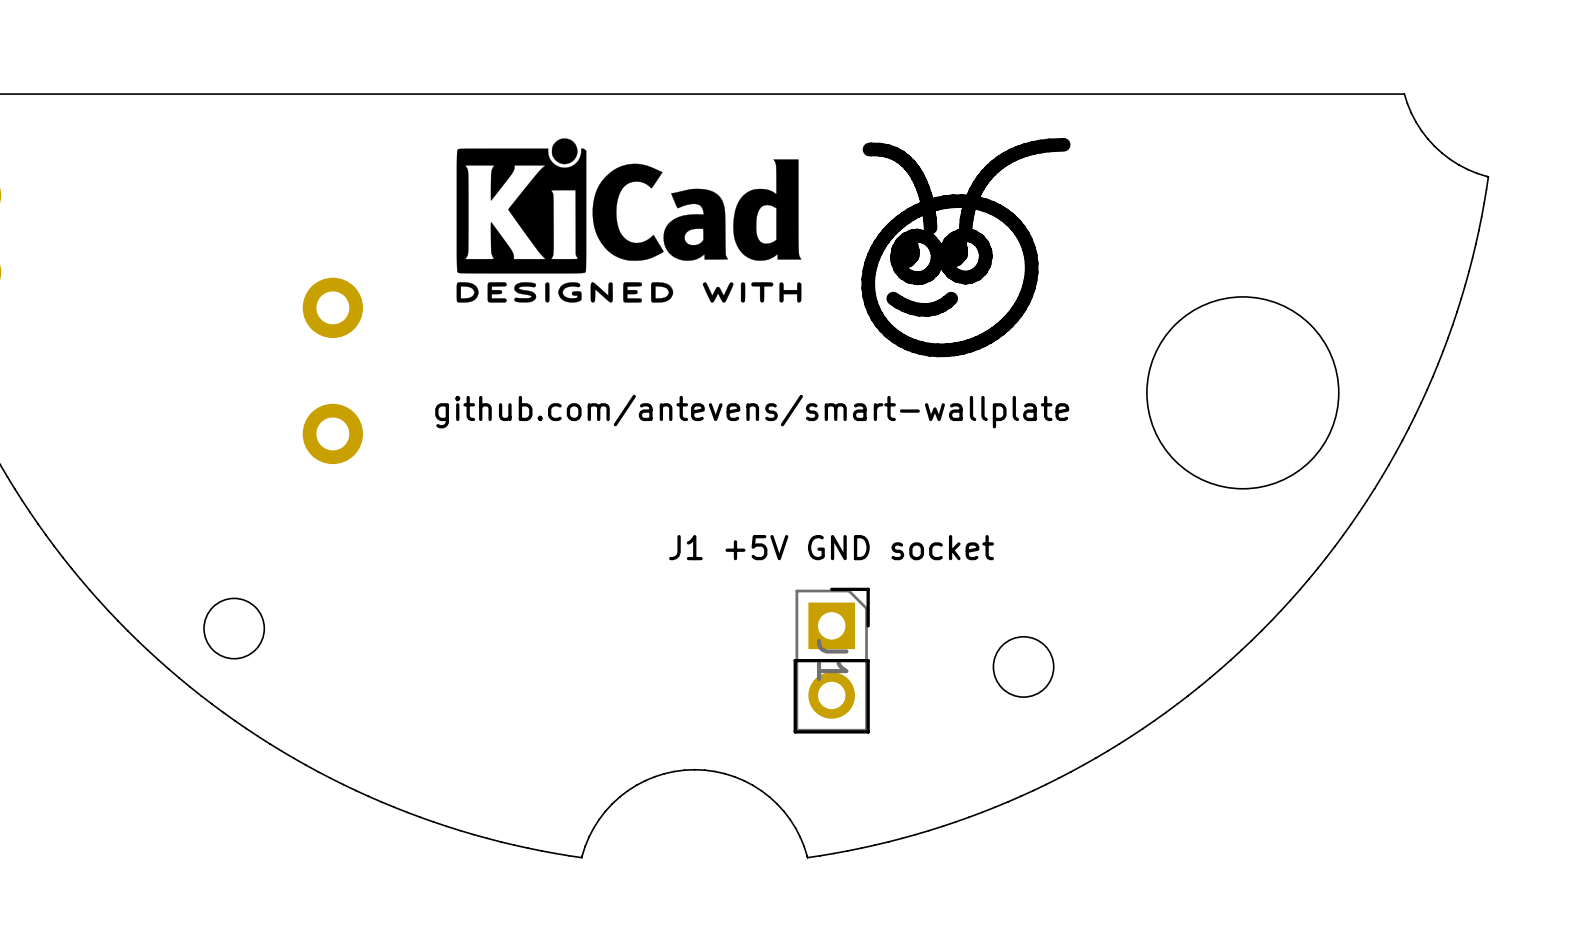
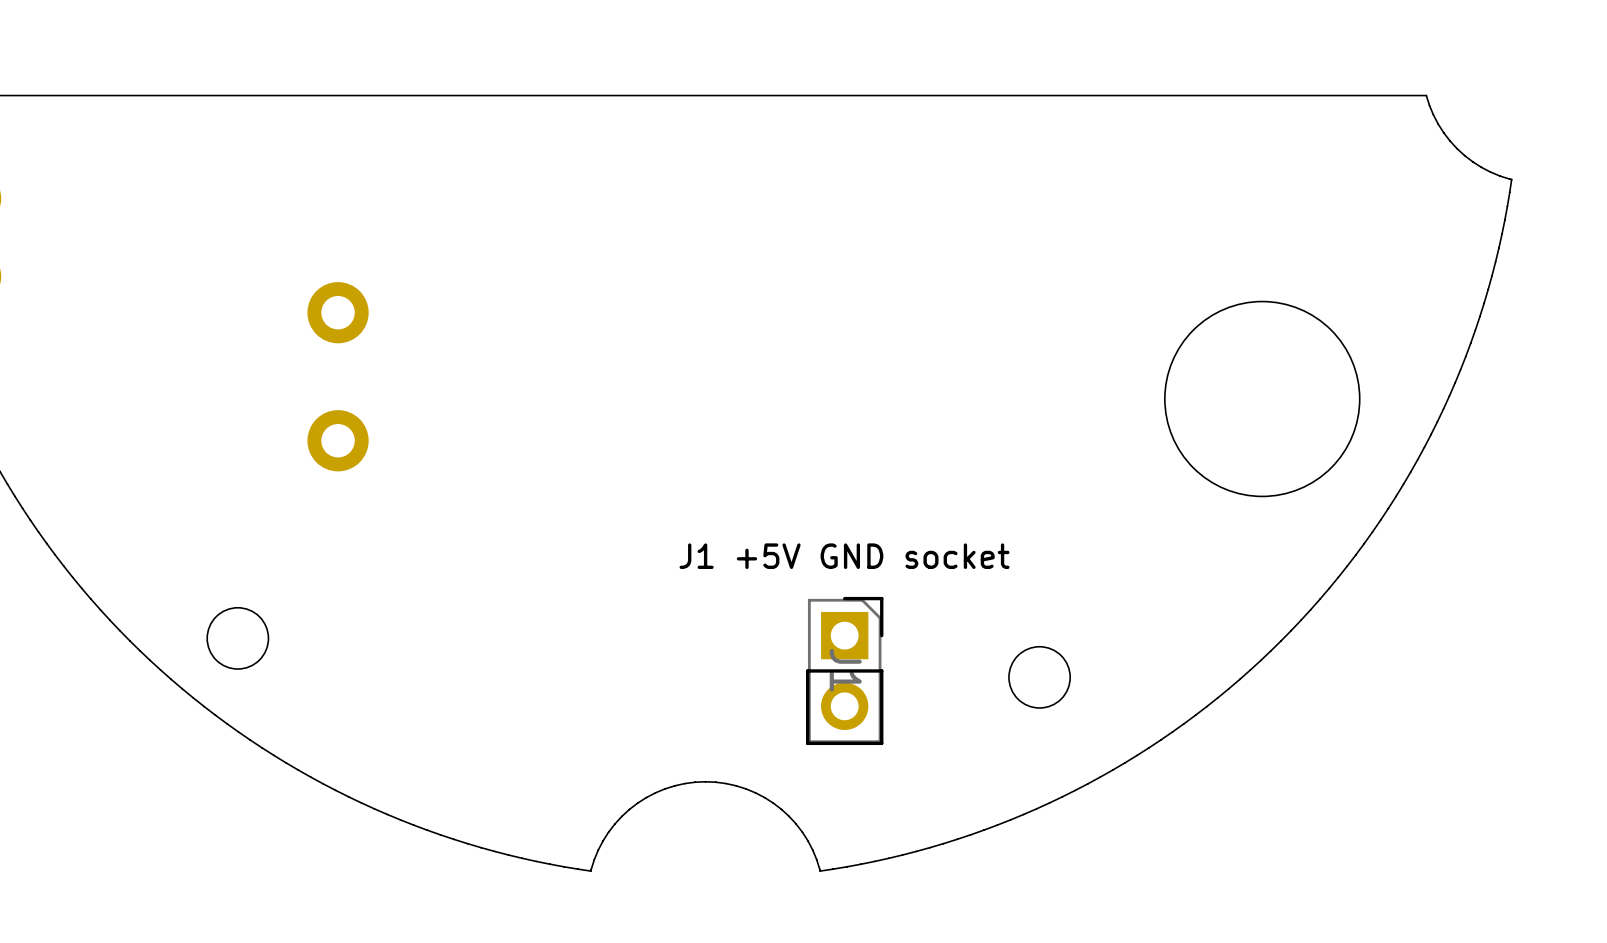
drawing: [861, 137, 1071, 358] -> none
drawing: [456, 138, 802, 303] -> none
text: github.com/antevens/smart-wallplate (752, 411) -> none

